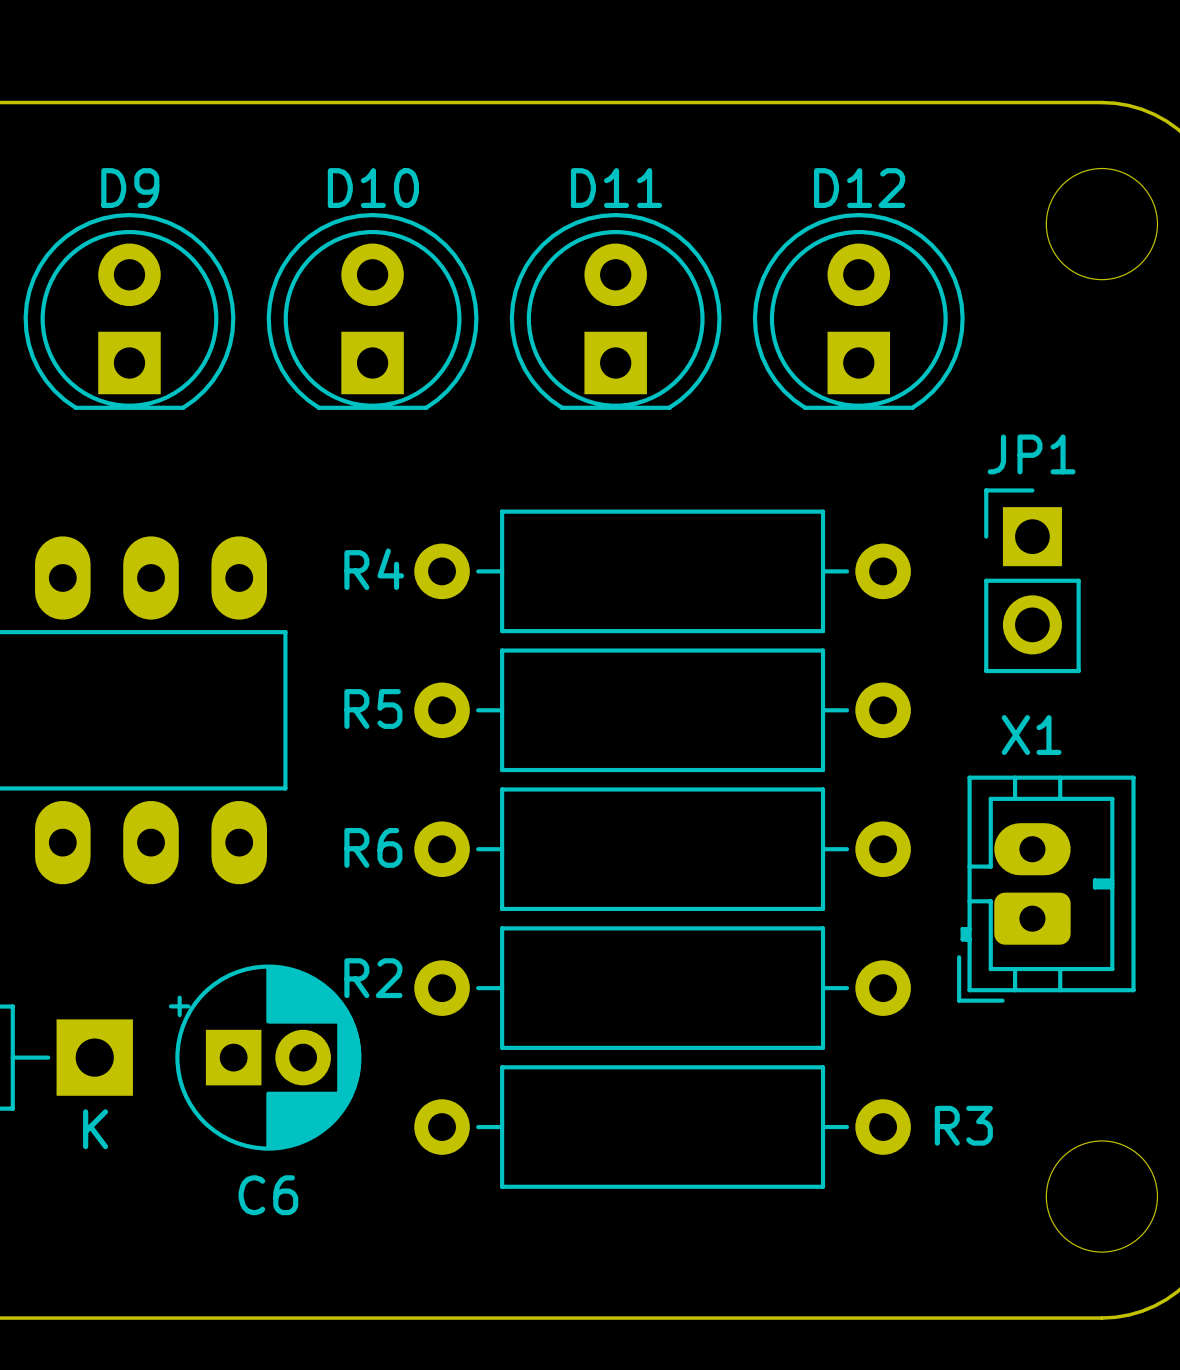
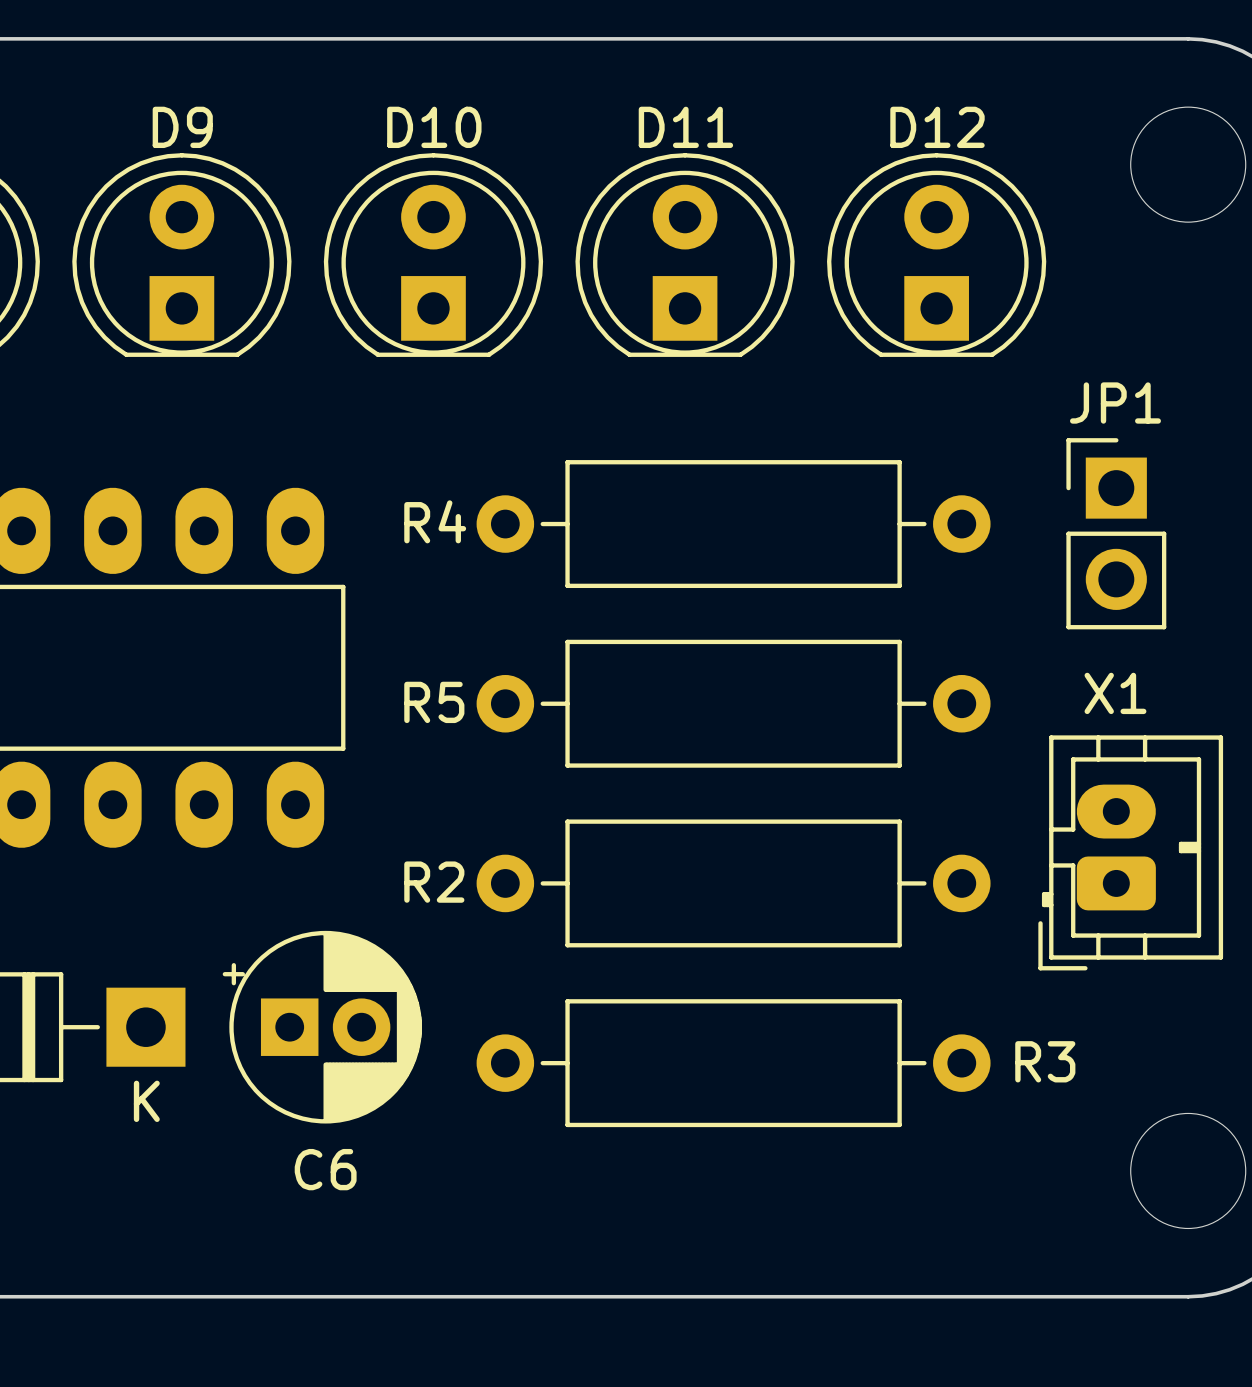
R5 position: (662, 710) -> (733, 703)
R6: (662, 849) -> none
R2 name position: R2 (373, 978) -> R2 (434, 882)
R2 position: (662, 988) -> (733, 883)
R3 position: (662, 1127) -> (733, 1063)

